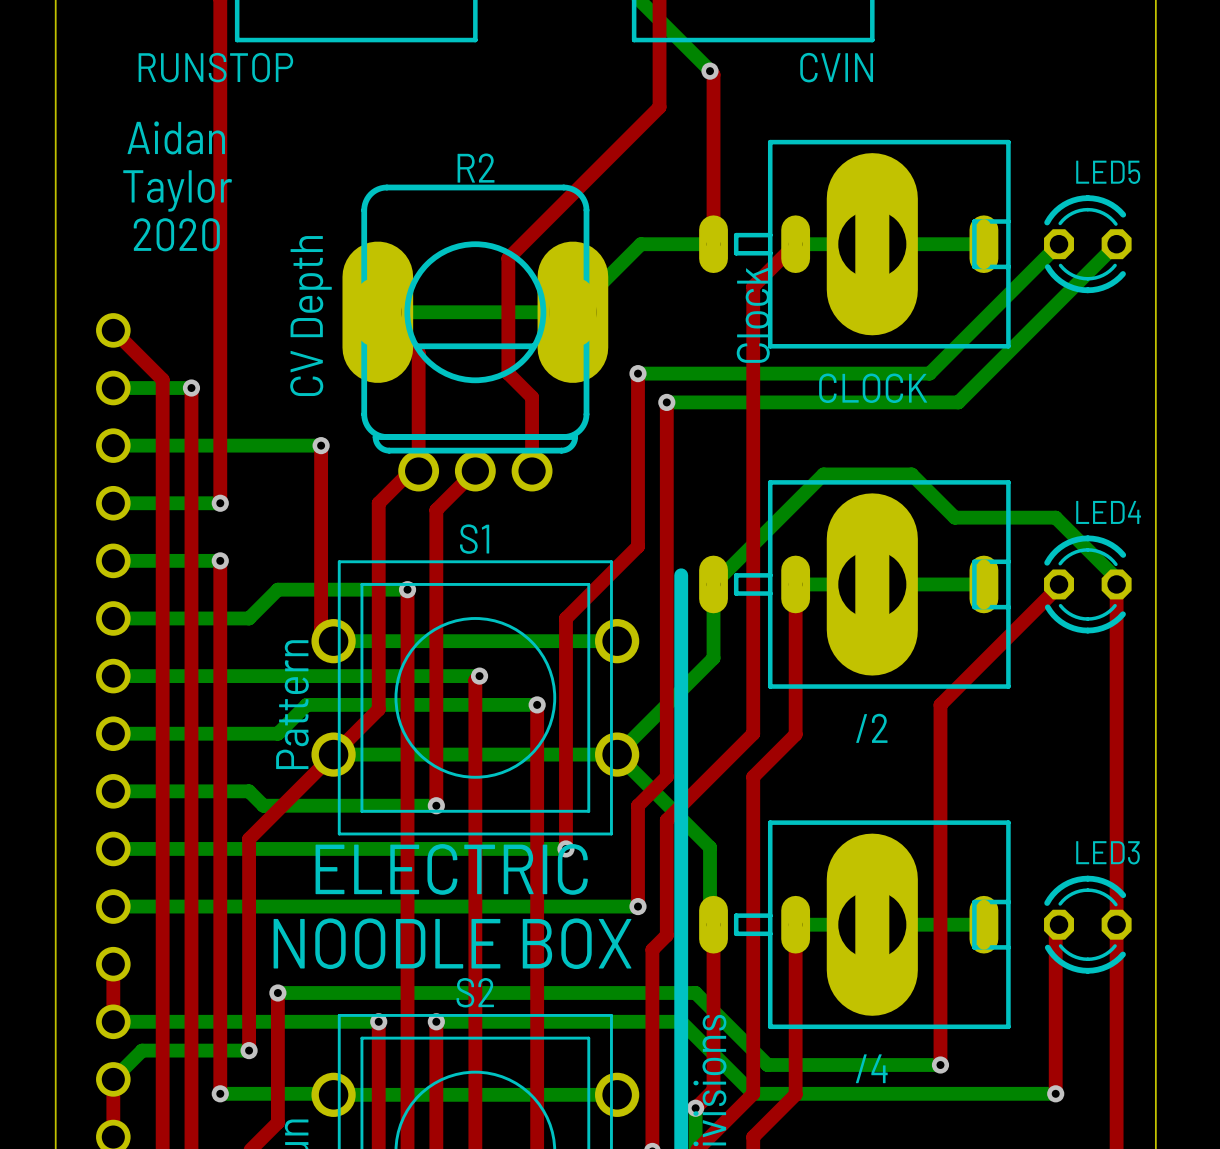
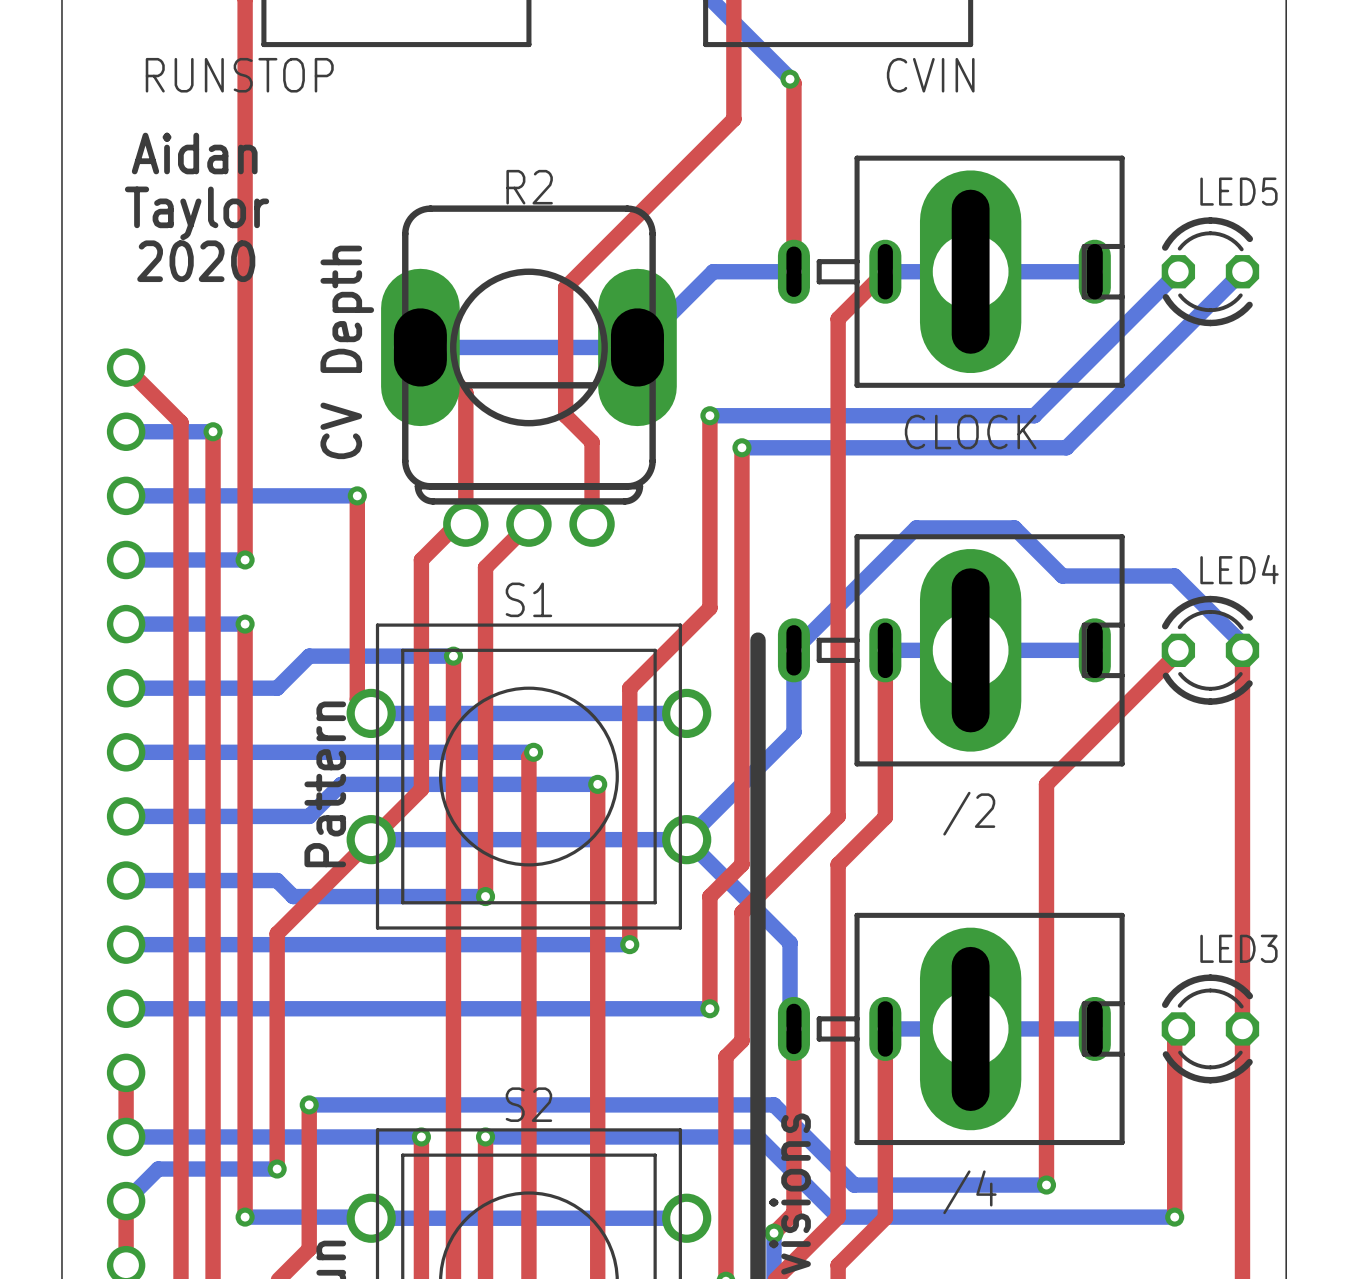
text: Clock (753, 315) -> none
text: ELECTRIC (451, 869) -> none
text: NOODLE BOX (452, 943) -> none

